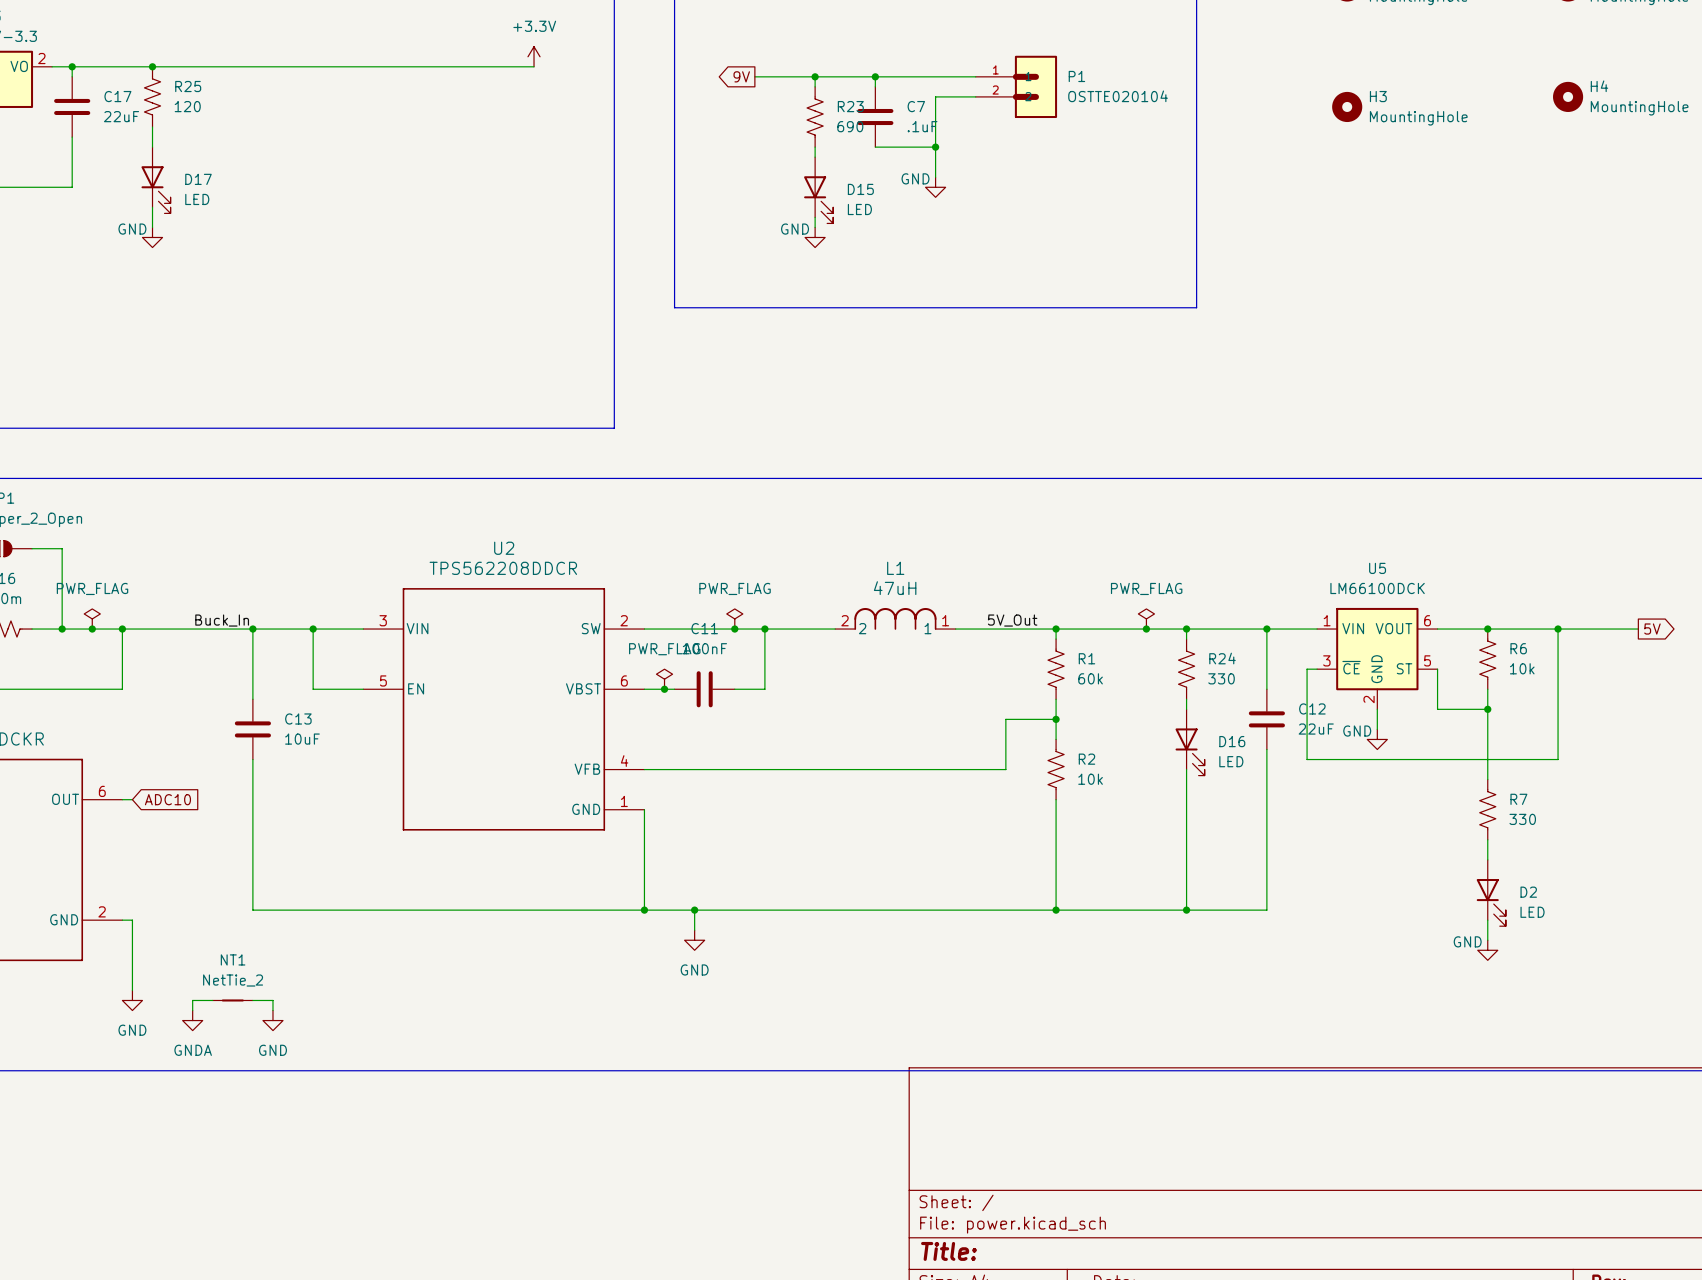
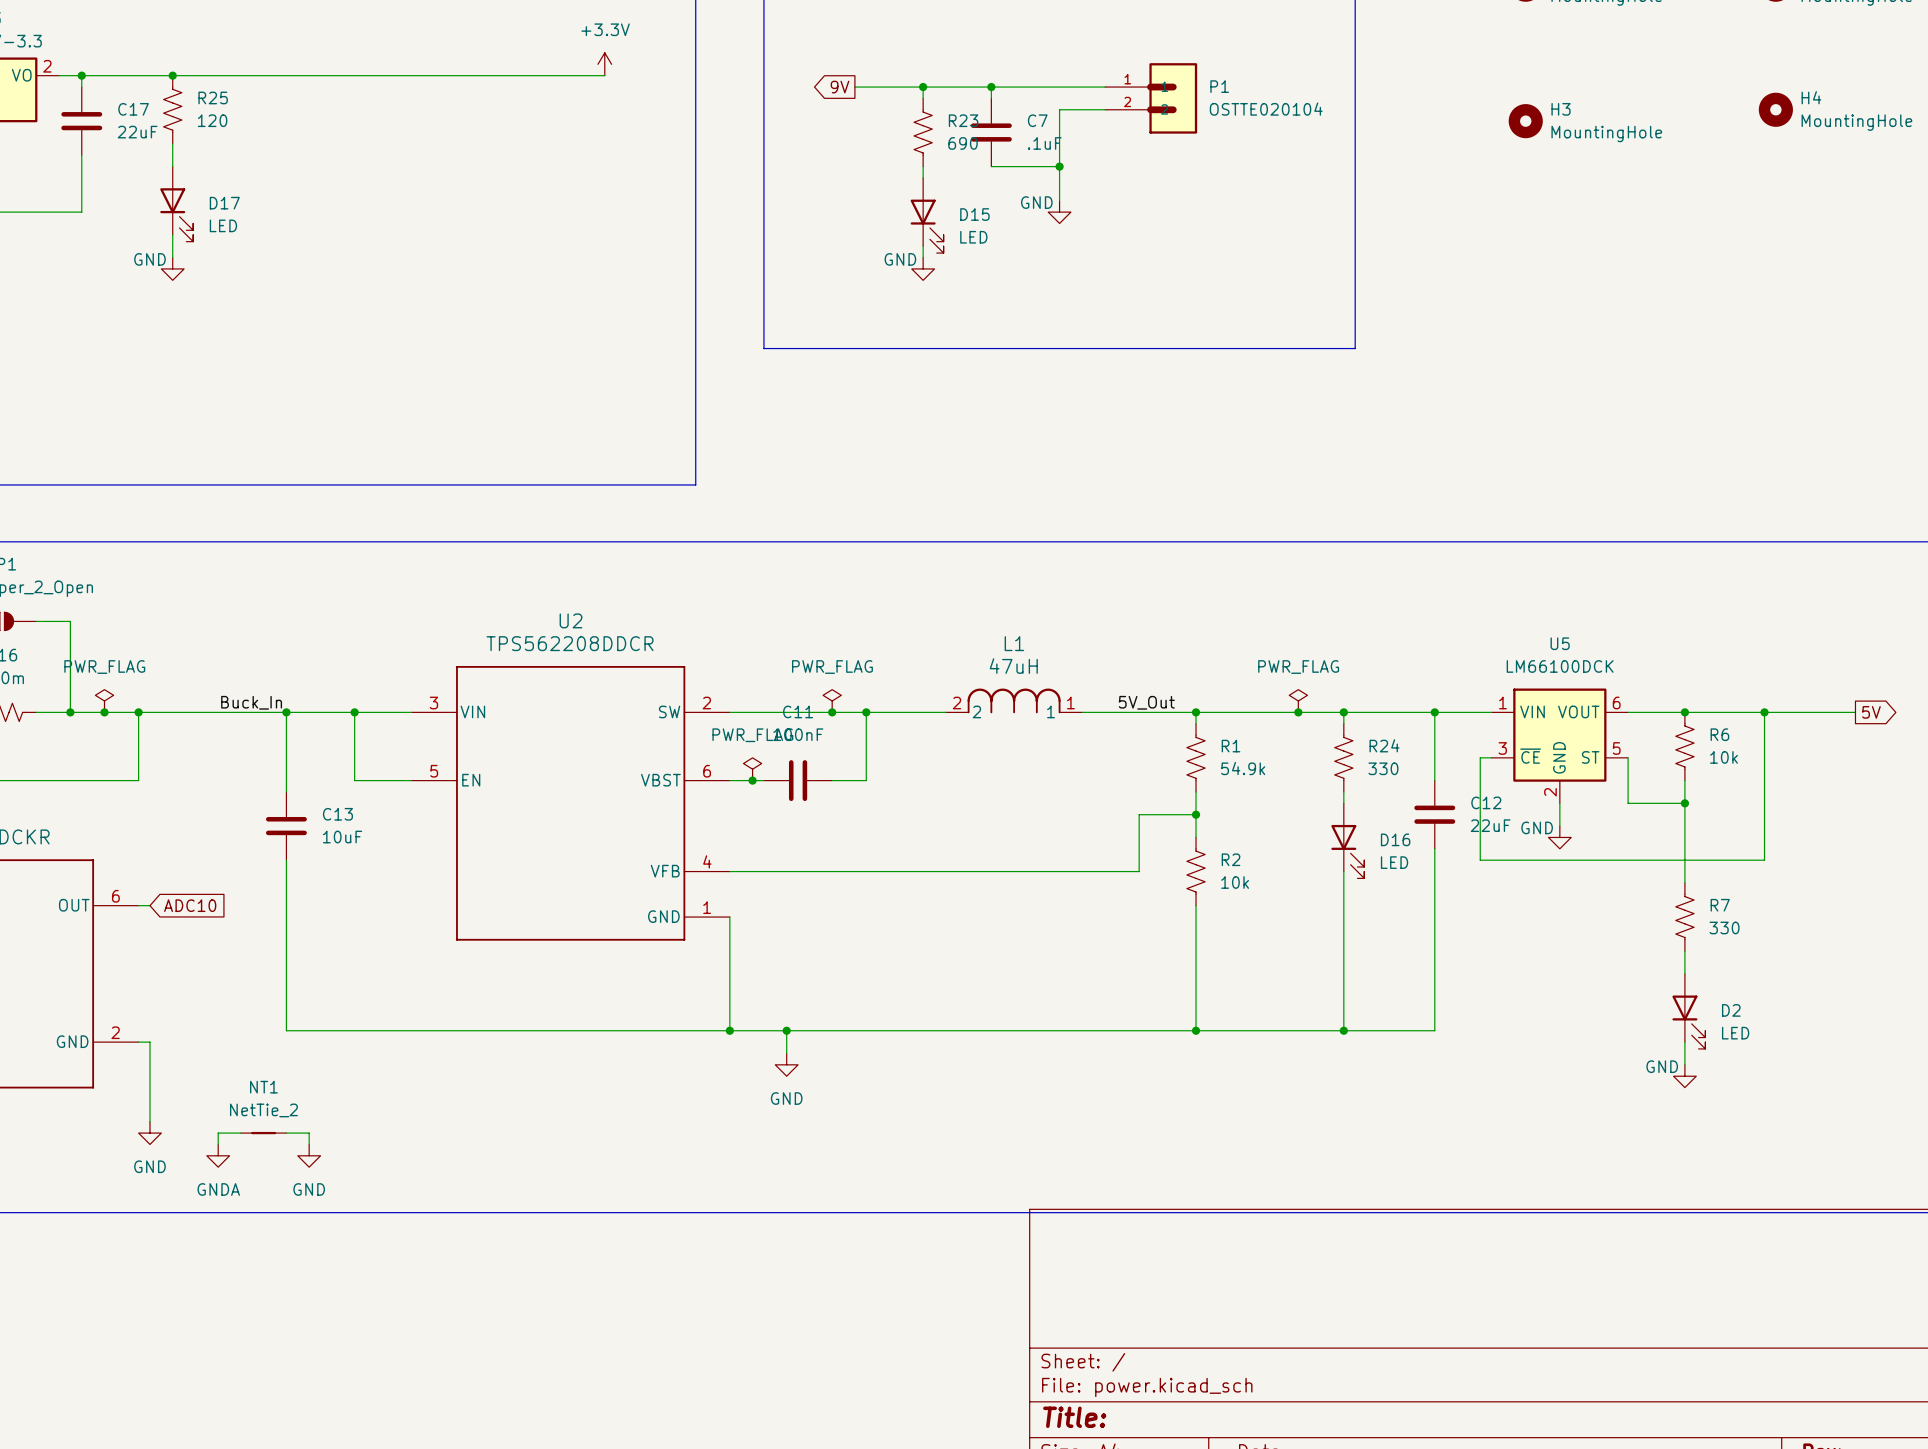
R1 value: 60k (1090, 678) -> 54.9k (1243, 768)

